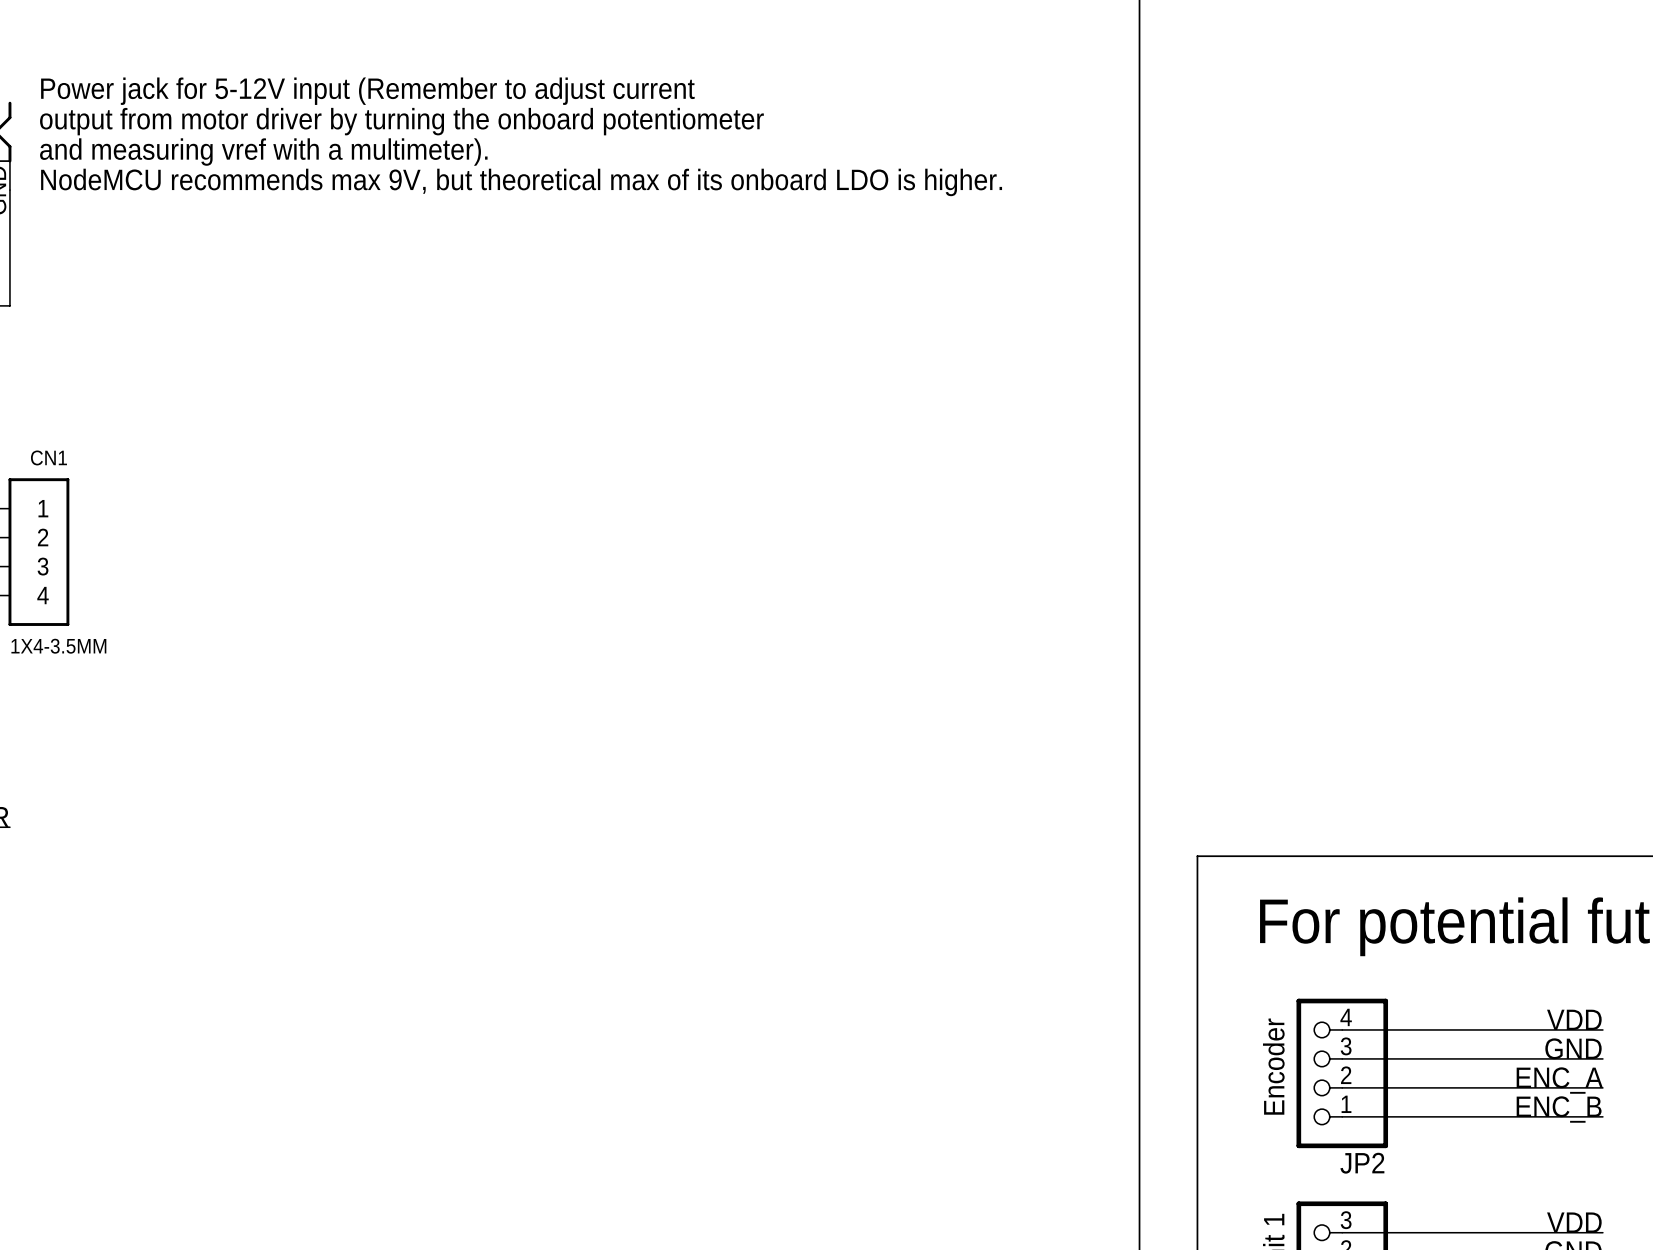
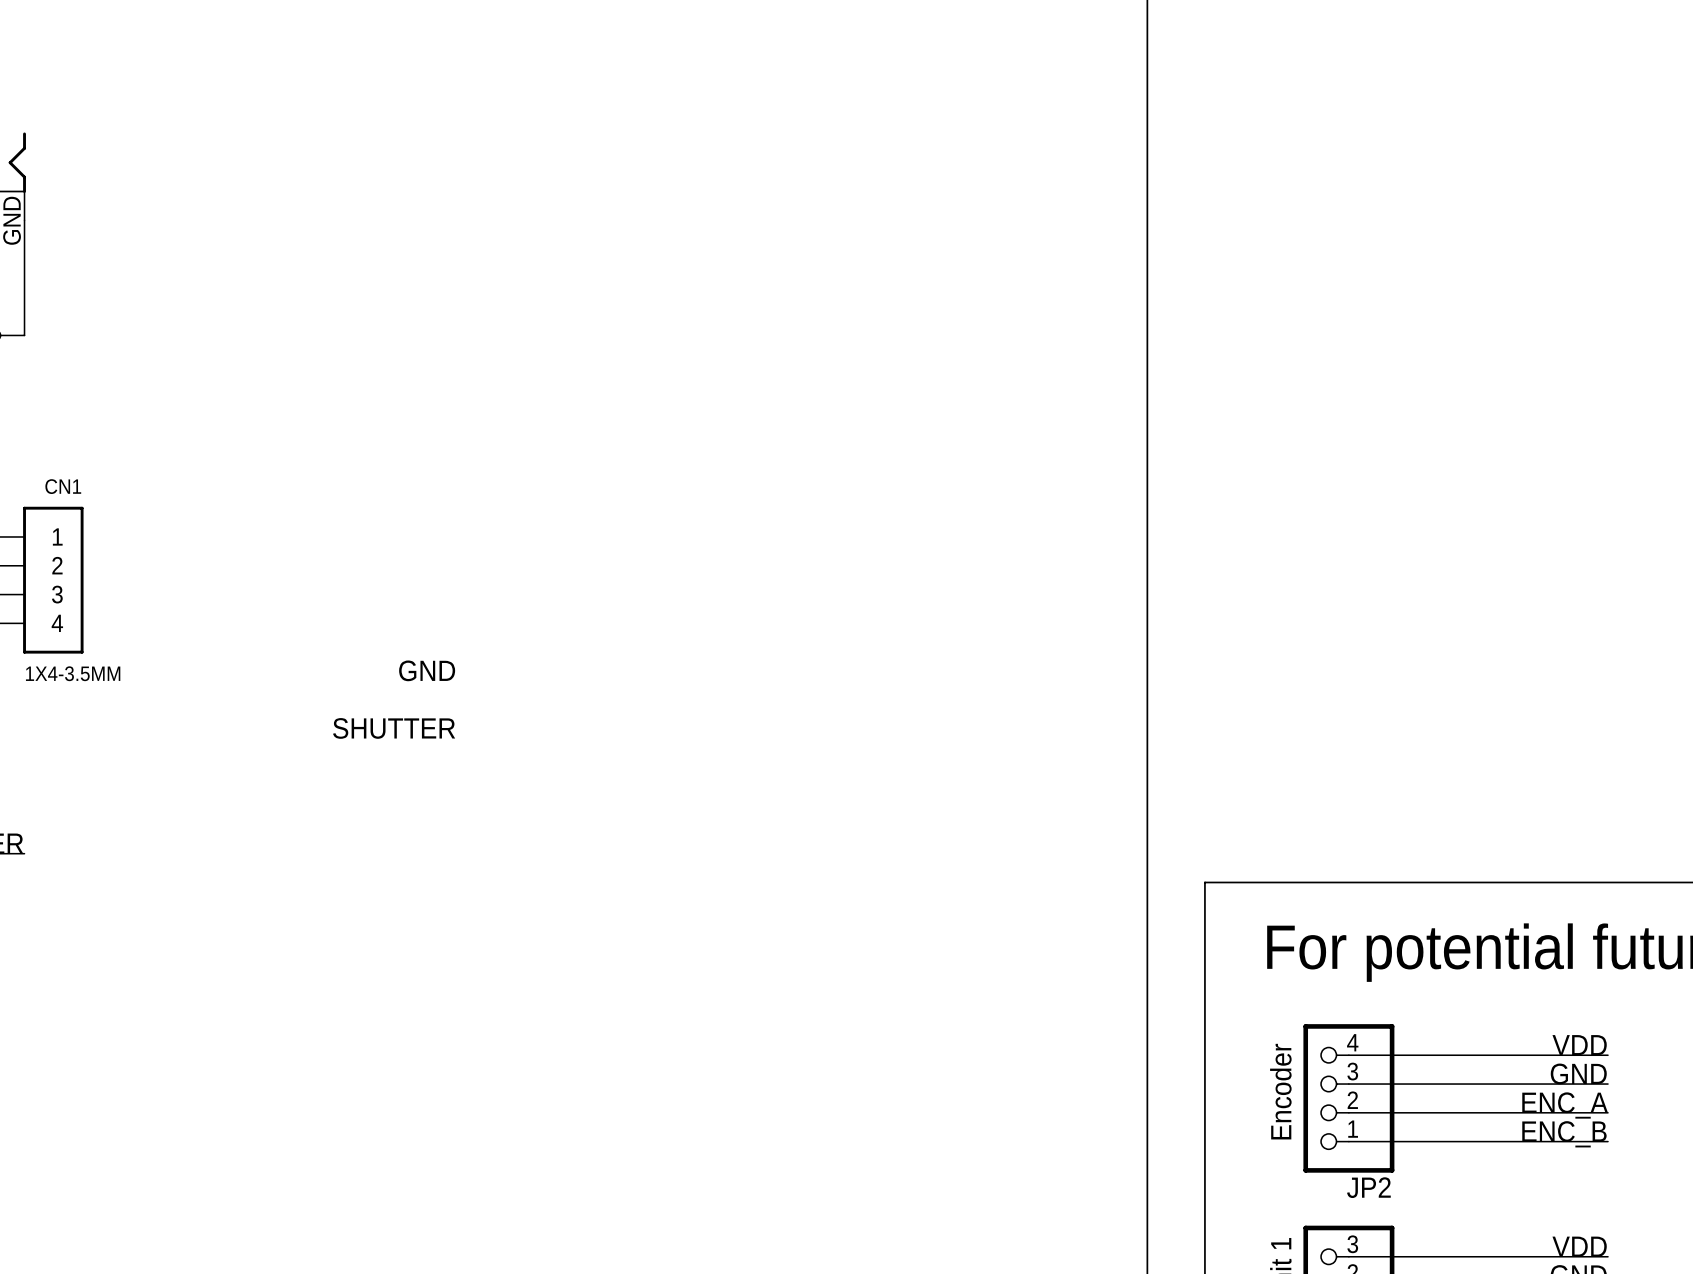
text: Power jack for 5-12V input (Remember to adjust current (367, 91) -> none
text: output from motor driver by turning the onboard potentiometer (401, 121) -> none
text: and measuring vref with a multimeter). (263, 152) -> none
text: NodeMCU recommends max 9V, but theoretical max of its onboard LDO is higher. (521, 182) -> none
label: none -> GND (427, 670)
label: none -> SHUTTER (394, 728)

